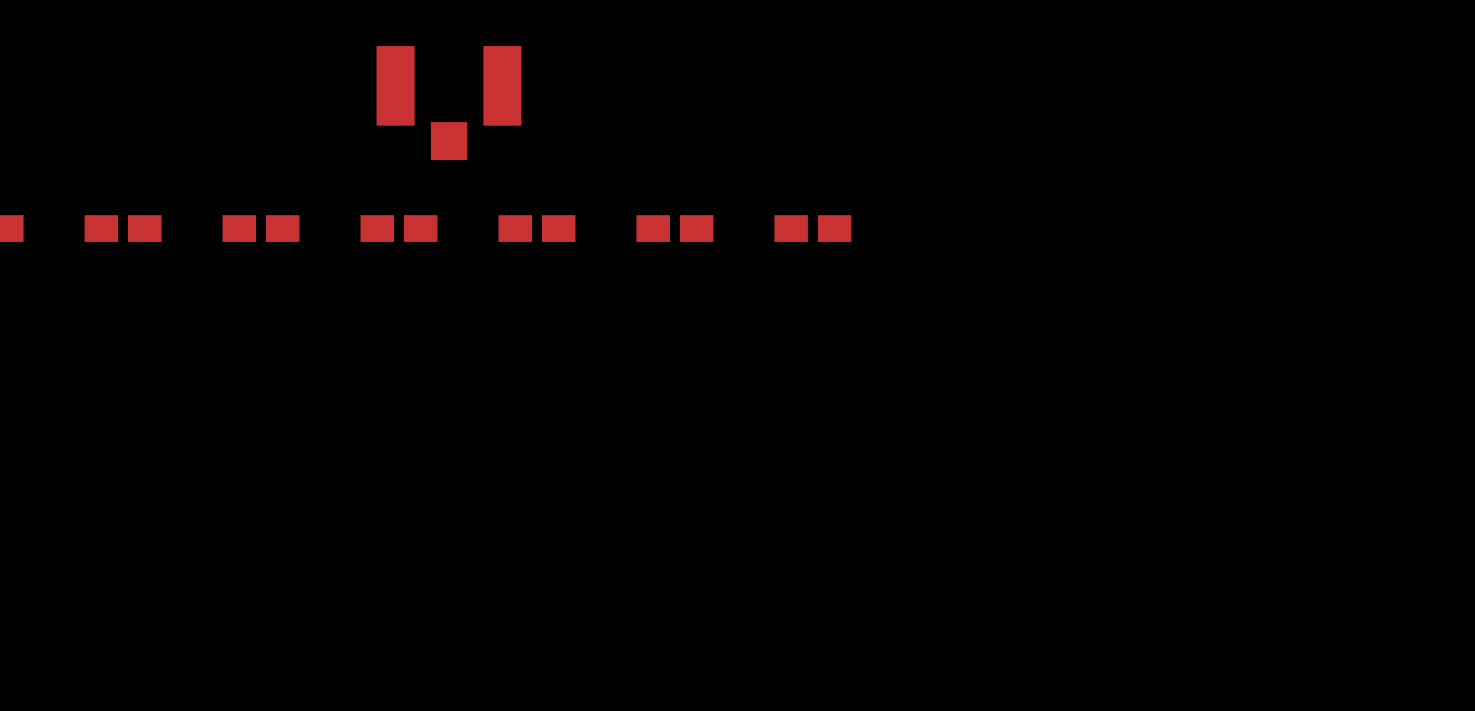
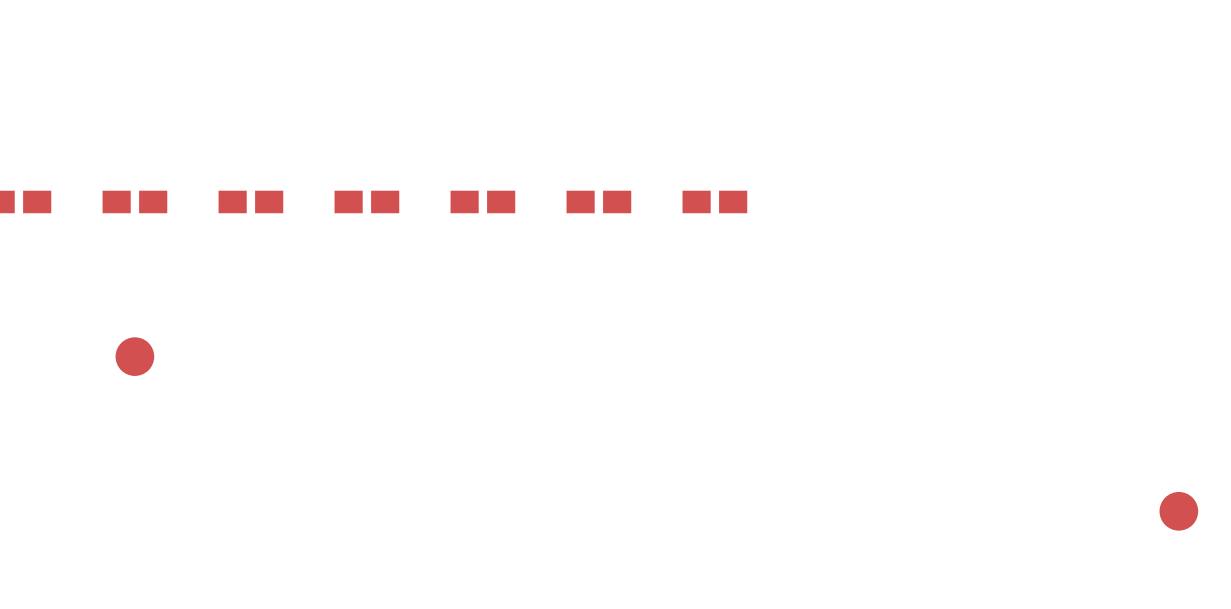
part: (448, 103) -> none
part: none -> (134, 356)
part: none -> (1178, 511)

